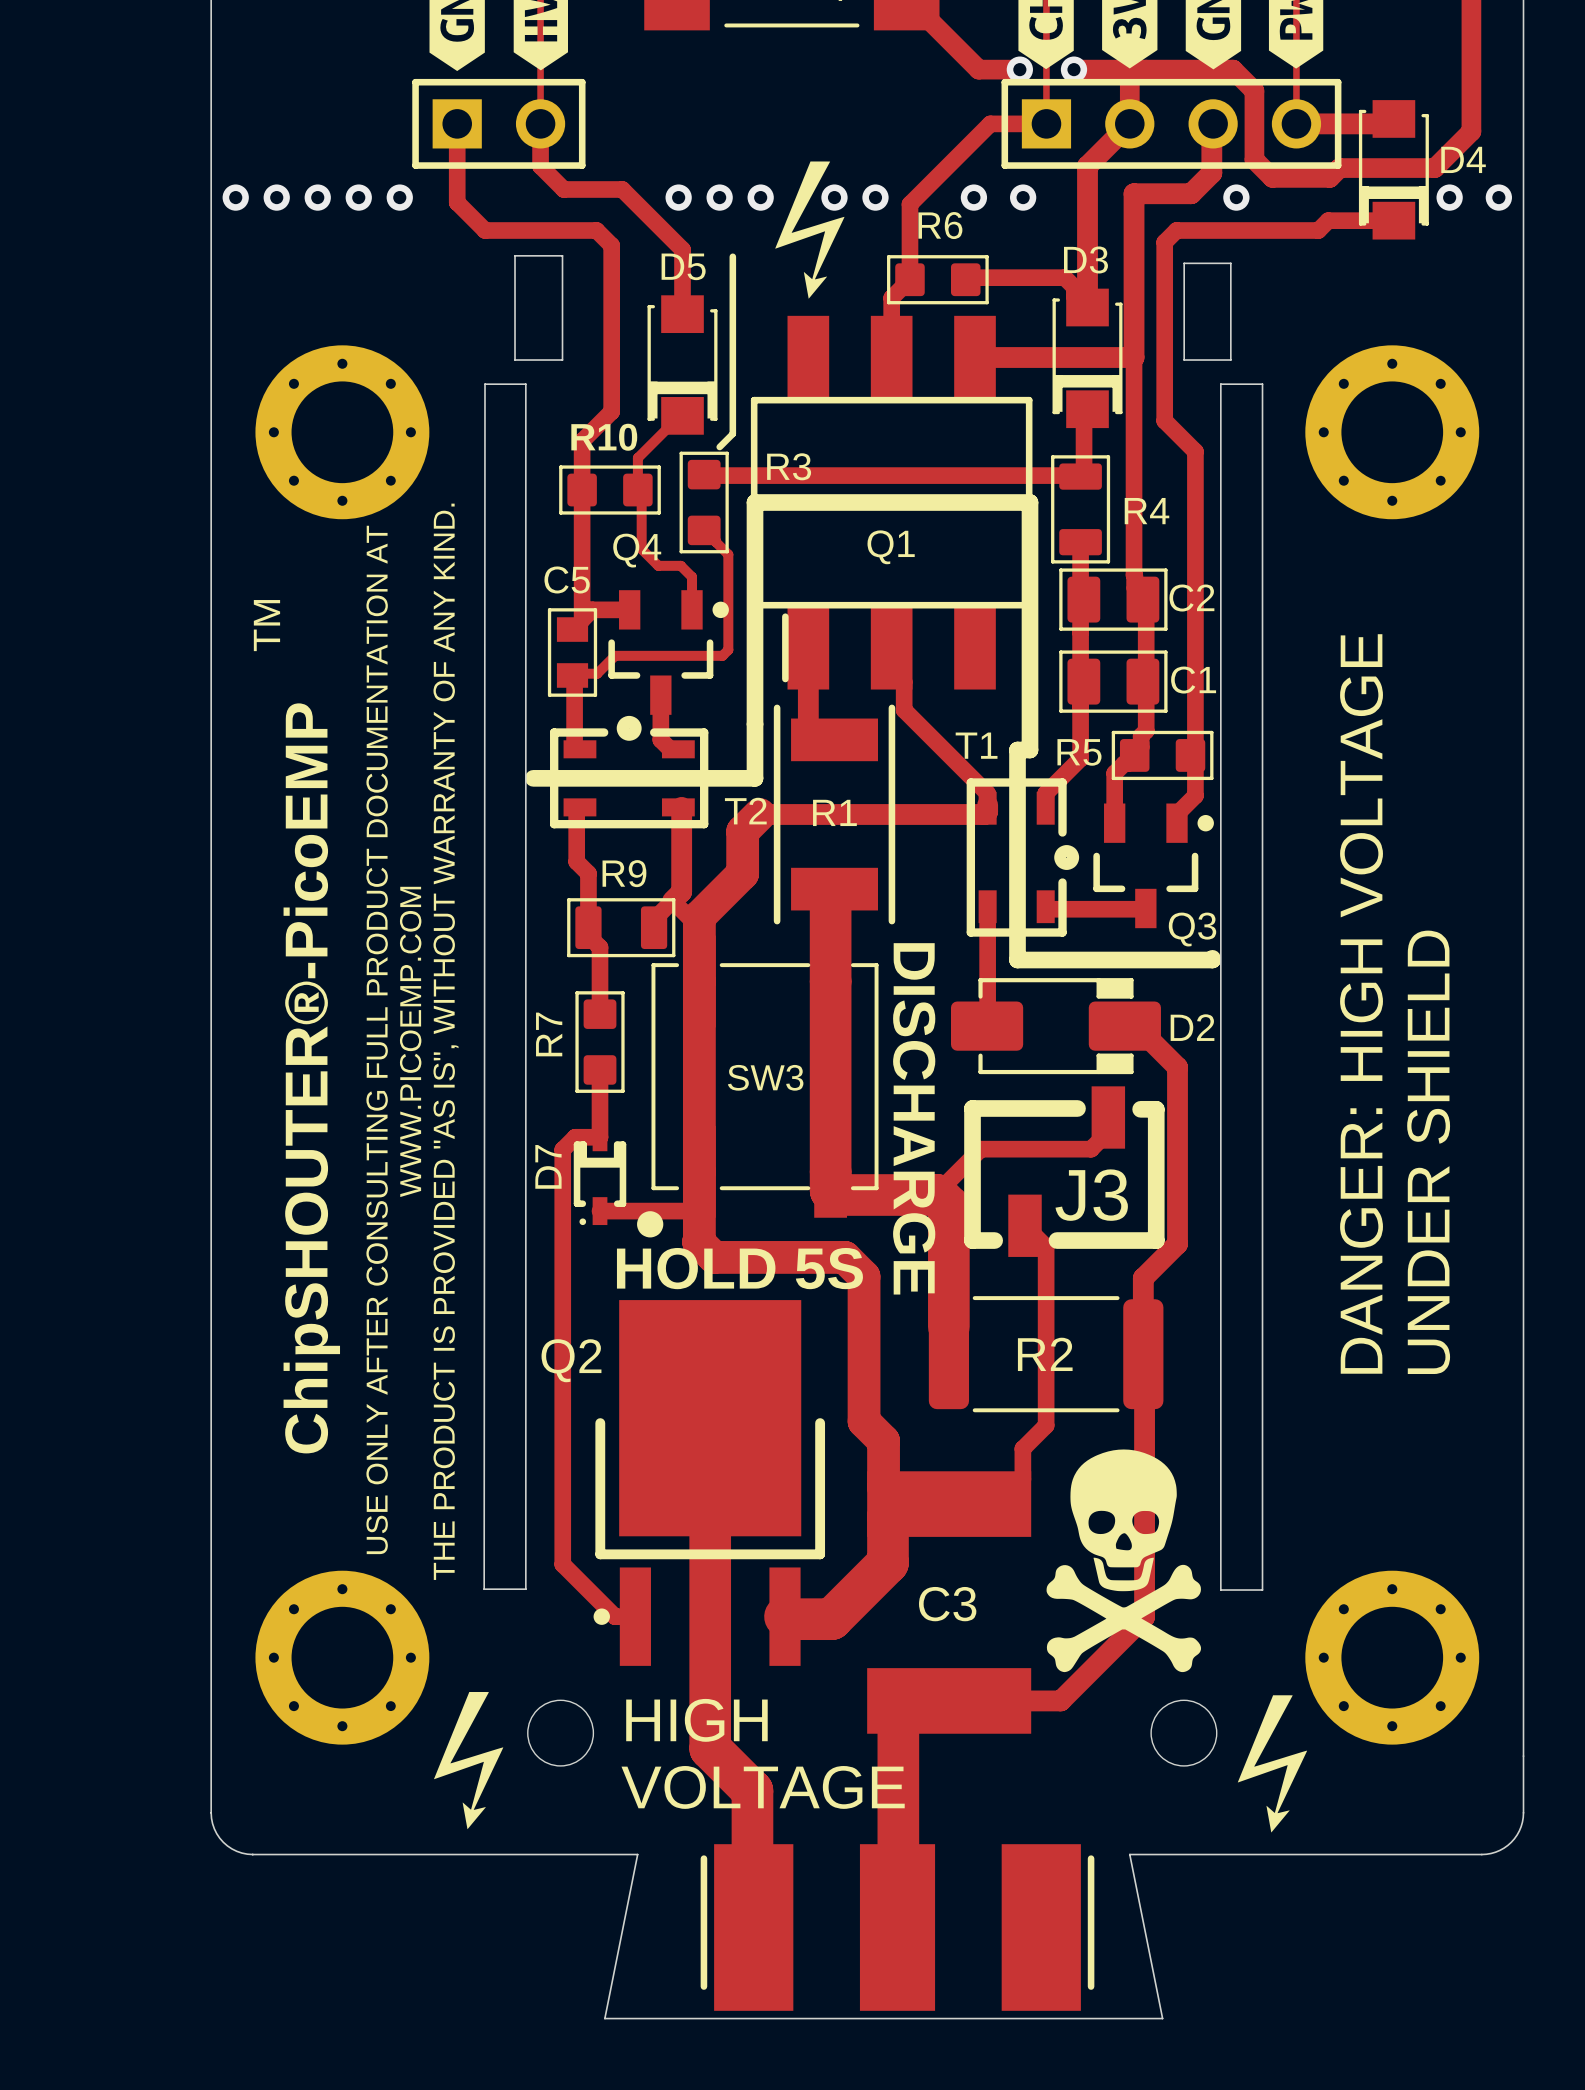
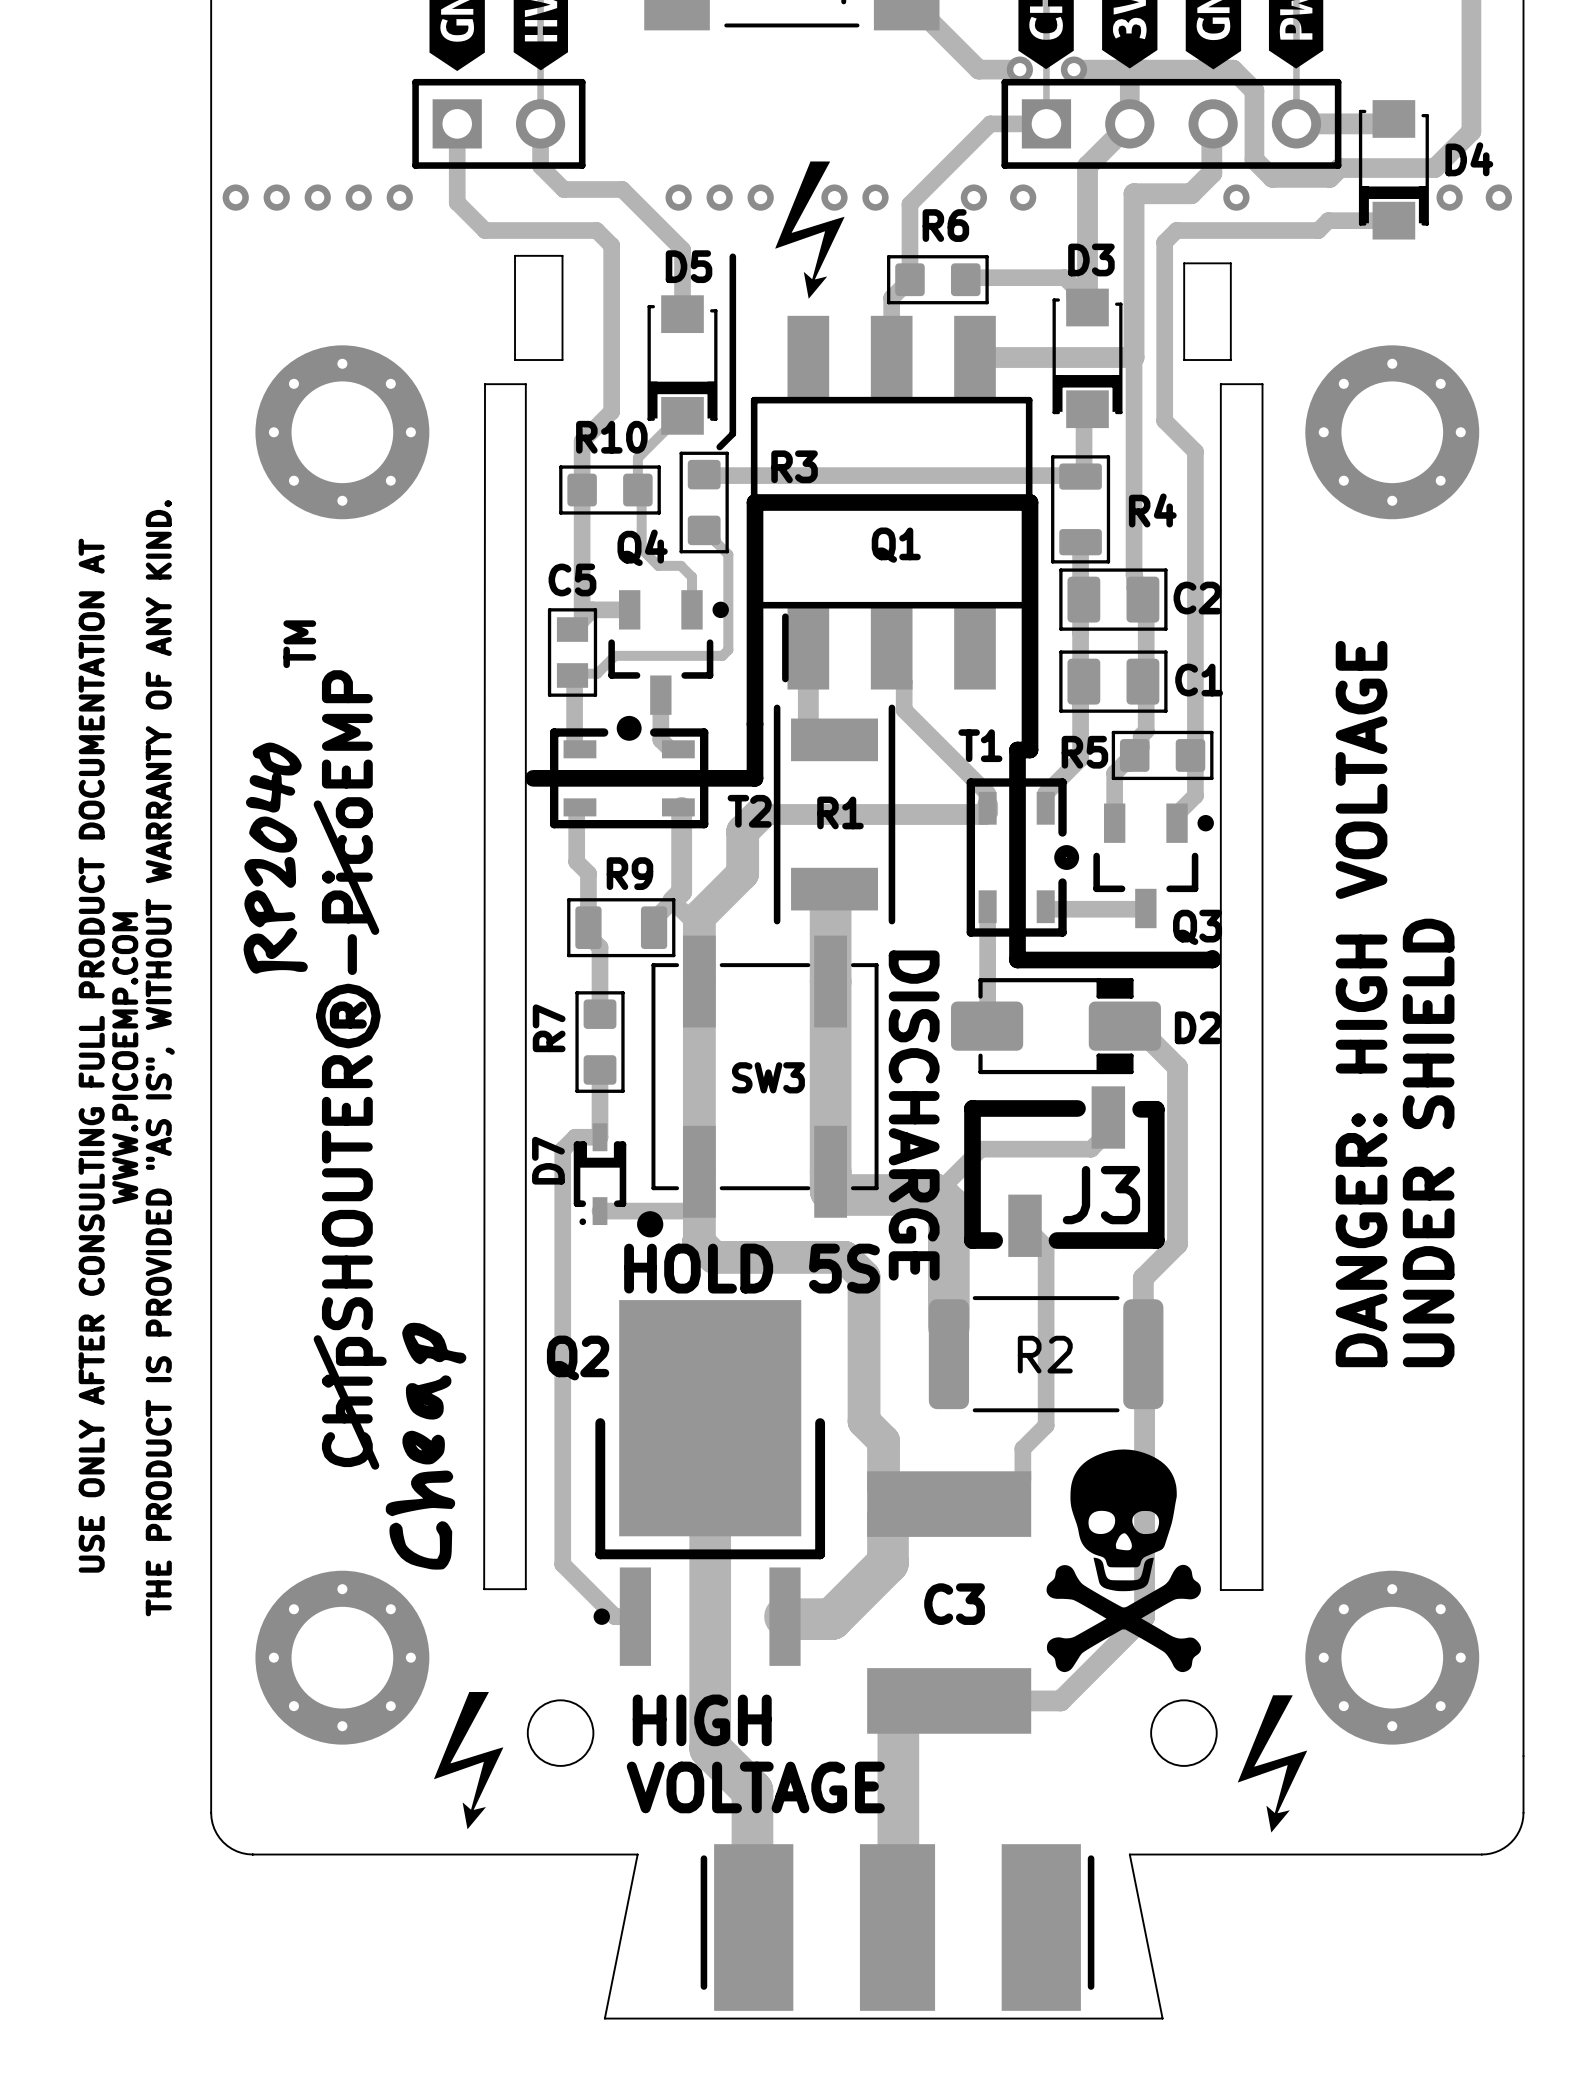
text position: TM (266, 625) -> TM (299, 644)
drawing: none -> [243, 742, 308, 974]
line: none -> (317, 804) (375, 930)
text position: USE ONLY AFTER CONSULTING FULL PRODUCT DOCUMENTATION AT (377, 1039) -> USE ONLY AFTER CONSULTING FULL PRODUCT DOCUMENTATION AT (91, 1055)
text position: WWW.PICOEMP.COM (410, 1041) -> WWW.PICOEMP.COM (125, 1058)
text position: THE PRODUCT IS PROVIDED "AS IS", WITHOUT WARRANTY OF ANY KIND. (446, 1041) -> THE PRODUCT IS PROVIDED "AS IS", WITHOUT WARRANTY OF ANY KIND. (160, 1058)
text position: ChipSHOUTER®-PicoEMP (311, 1078) -> ChipSHOUTER®-PicoEMP (351, 1068)
drawing: none -> [385, 1322, 467, 1570]
line: none -> (317, 1339) (375, 1465)

